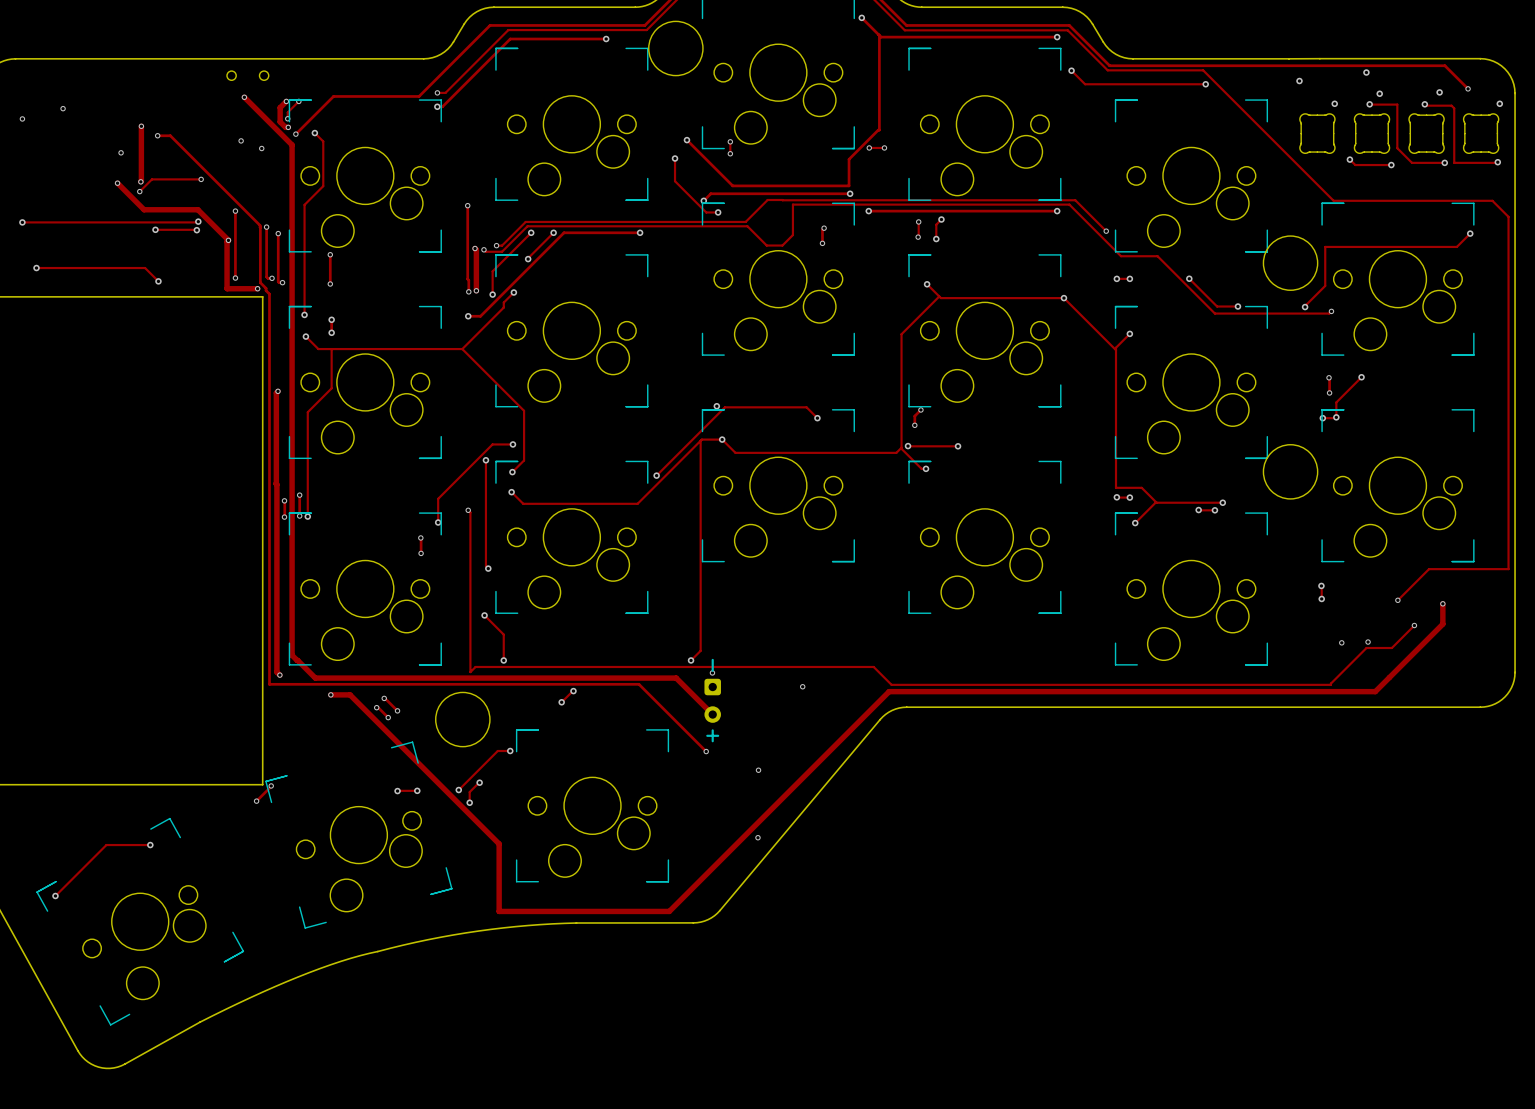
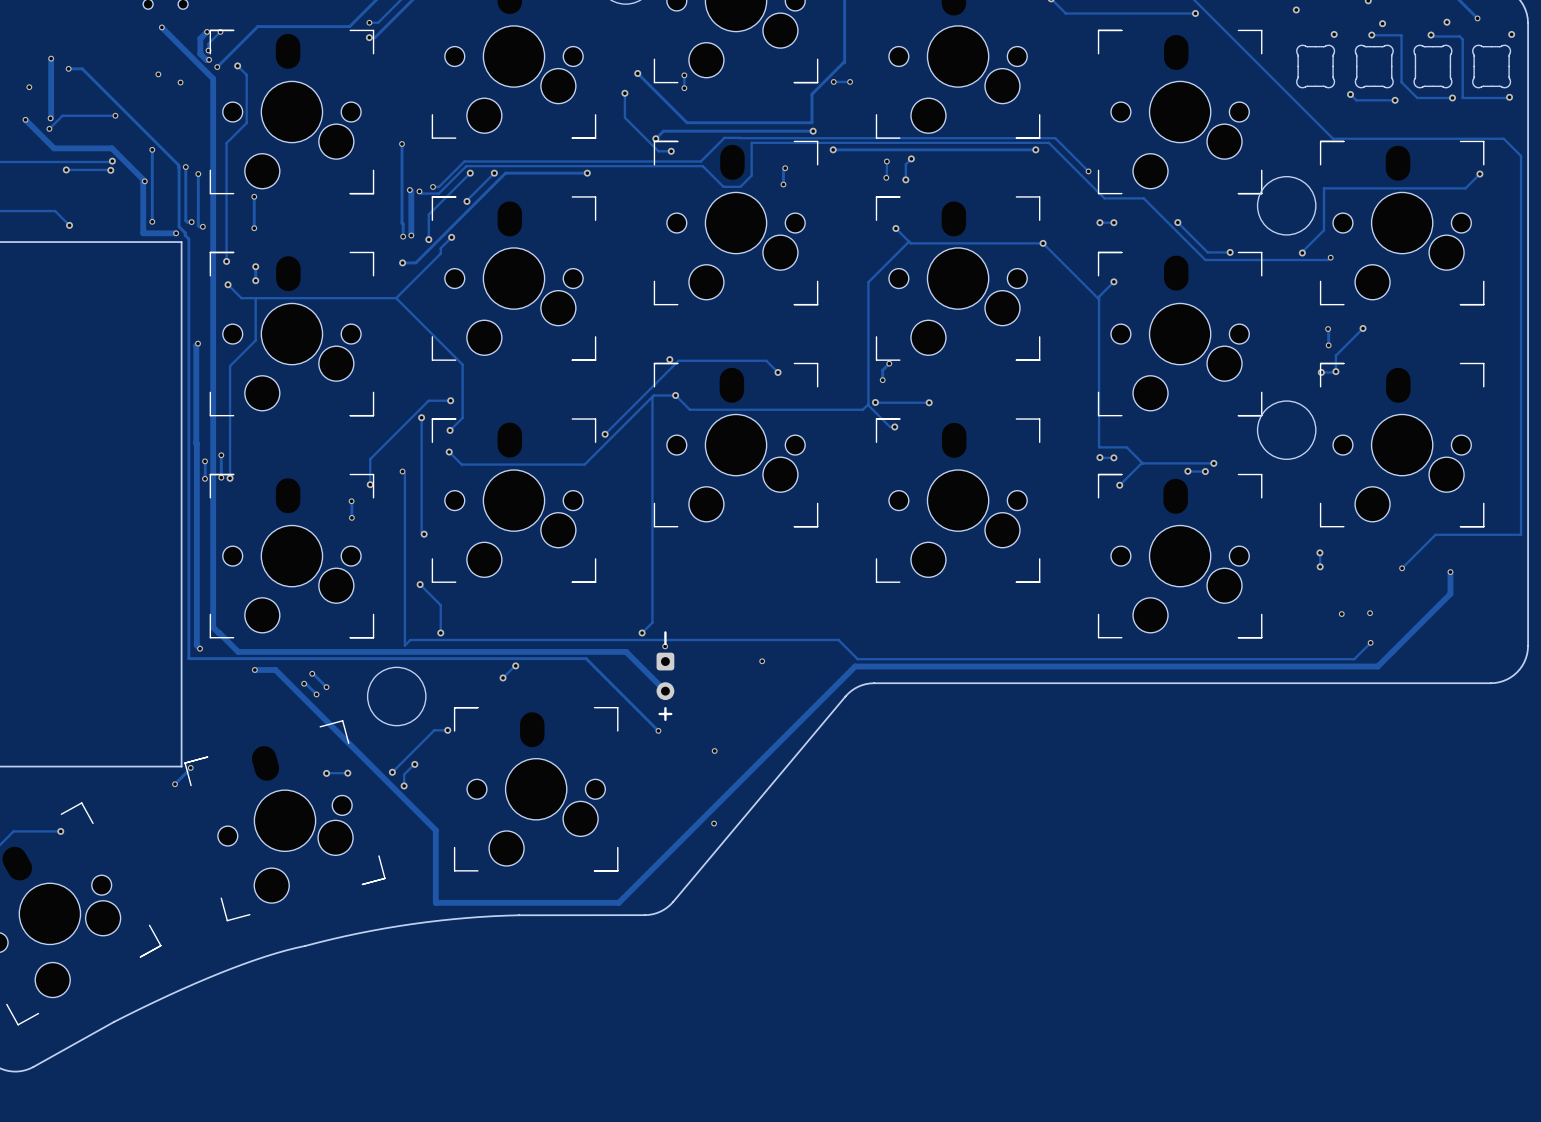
track: (1414, 625) (1391, 648) (1366, 648) (1330, 684) -> (1370, 642) (1354, 659) (1330, 659)
via position: (1414, 625) -> (1370, 642)

